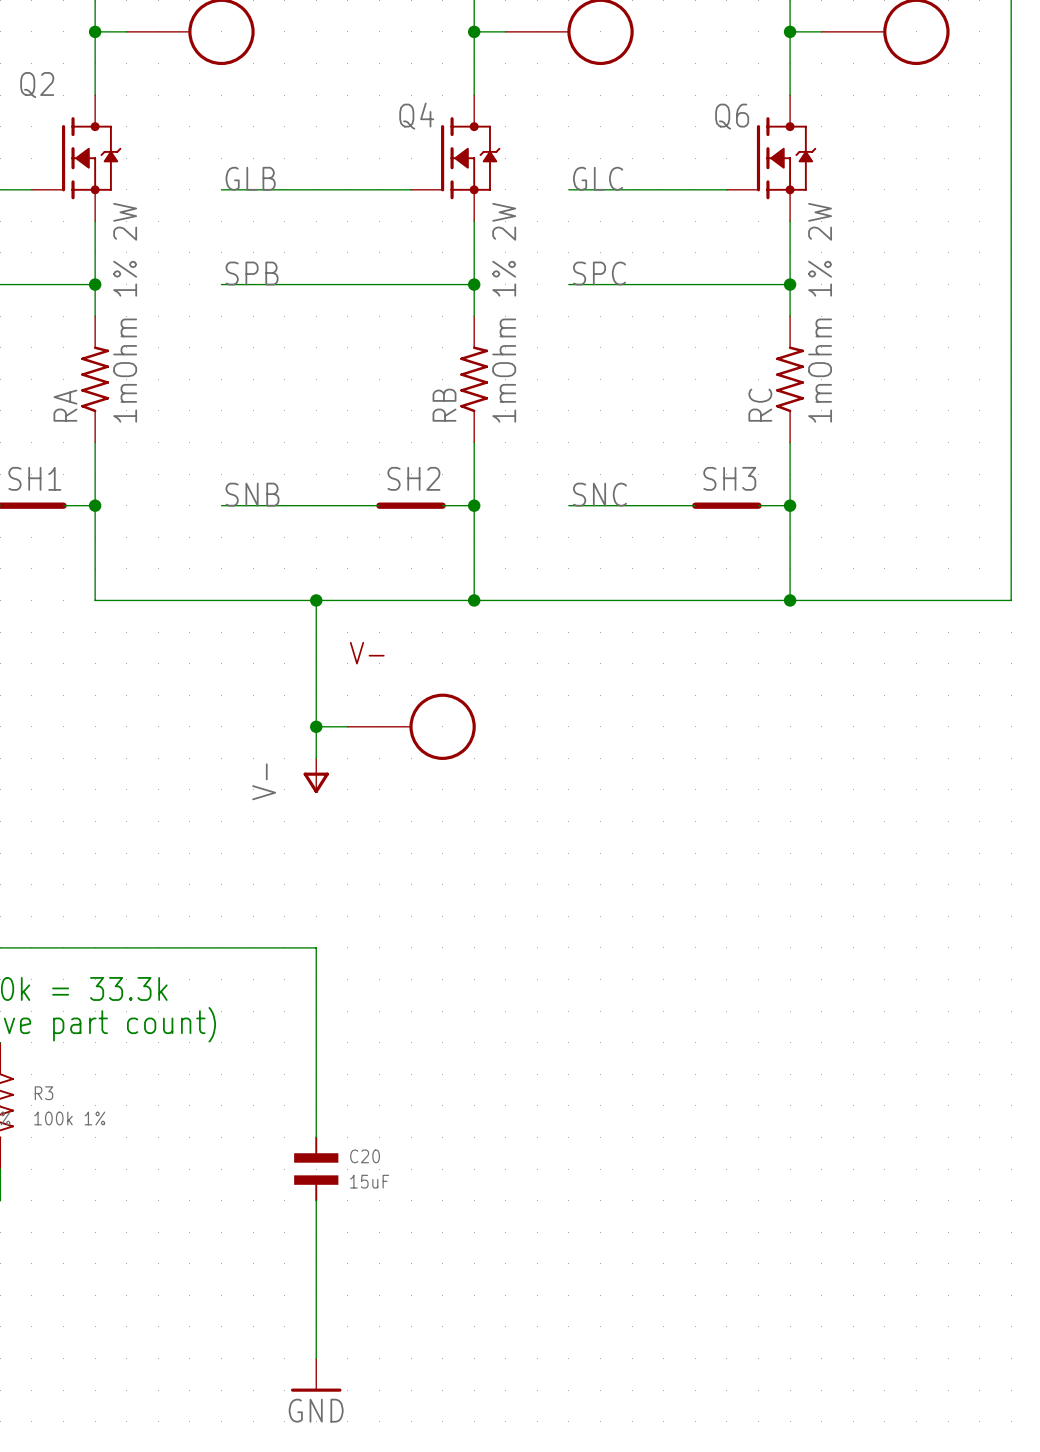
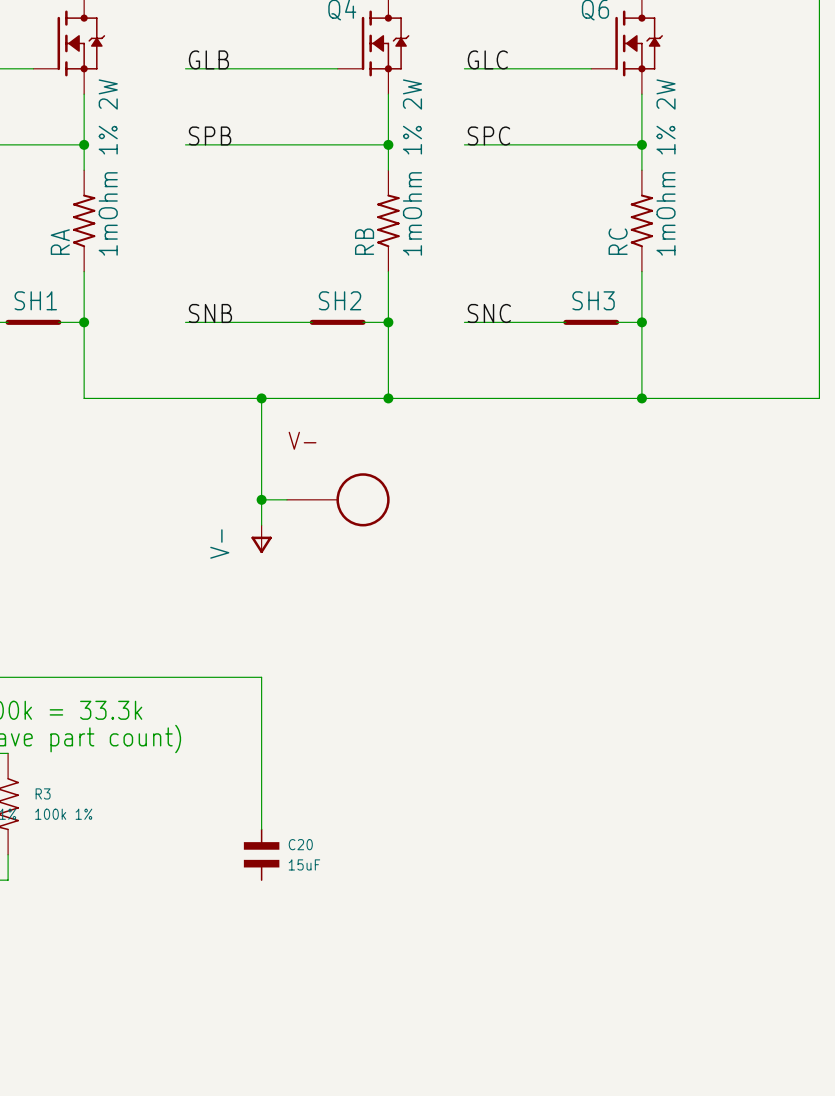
wire: (316, 1200) (316, 1358) -> none
power symbol: GND (316, 1375) -> none

